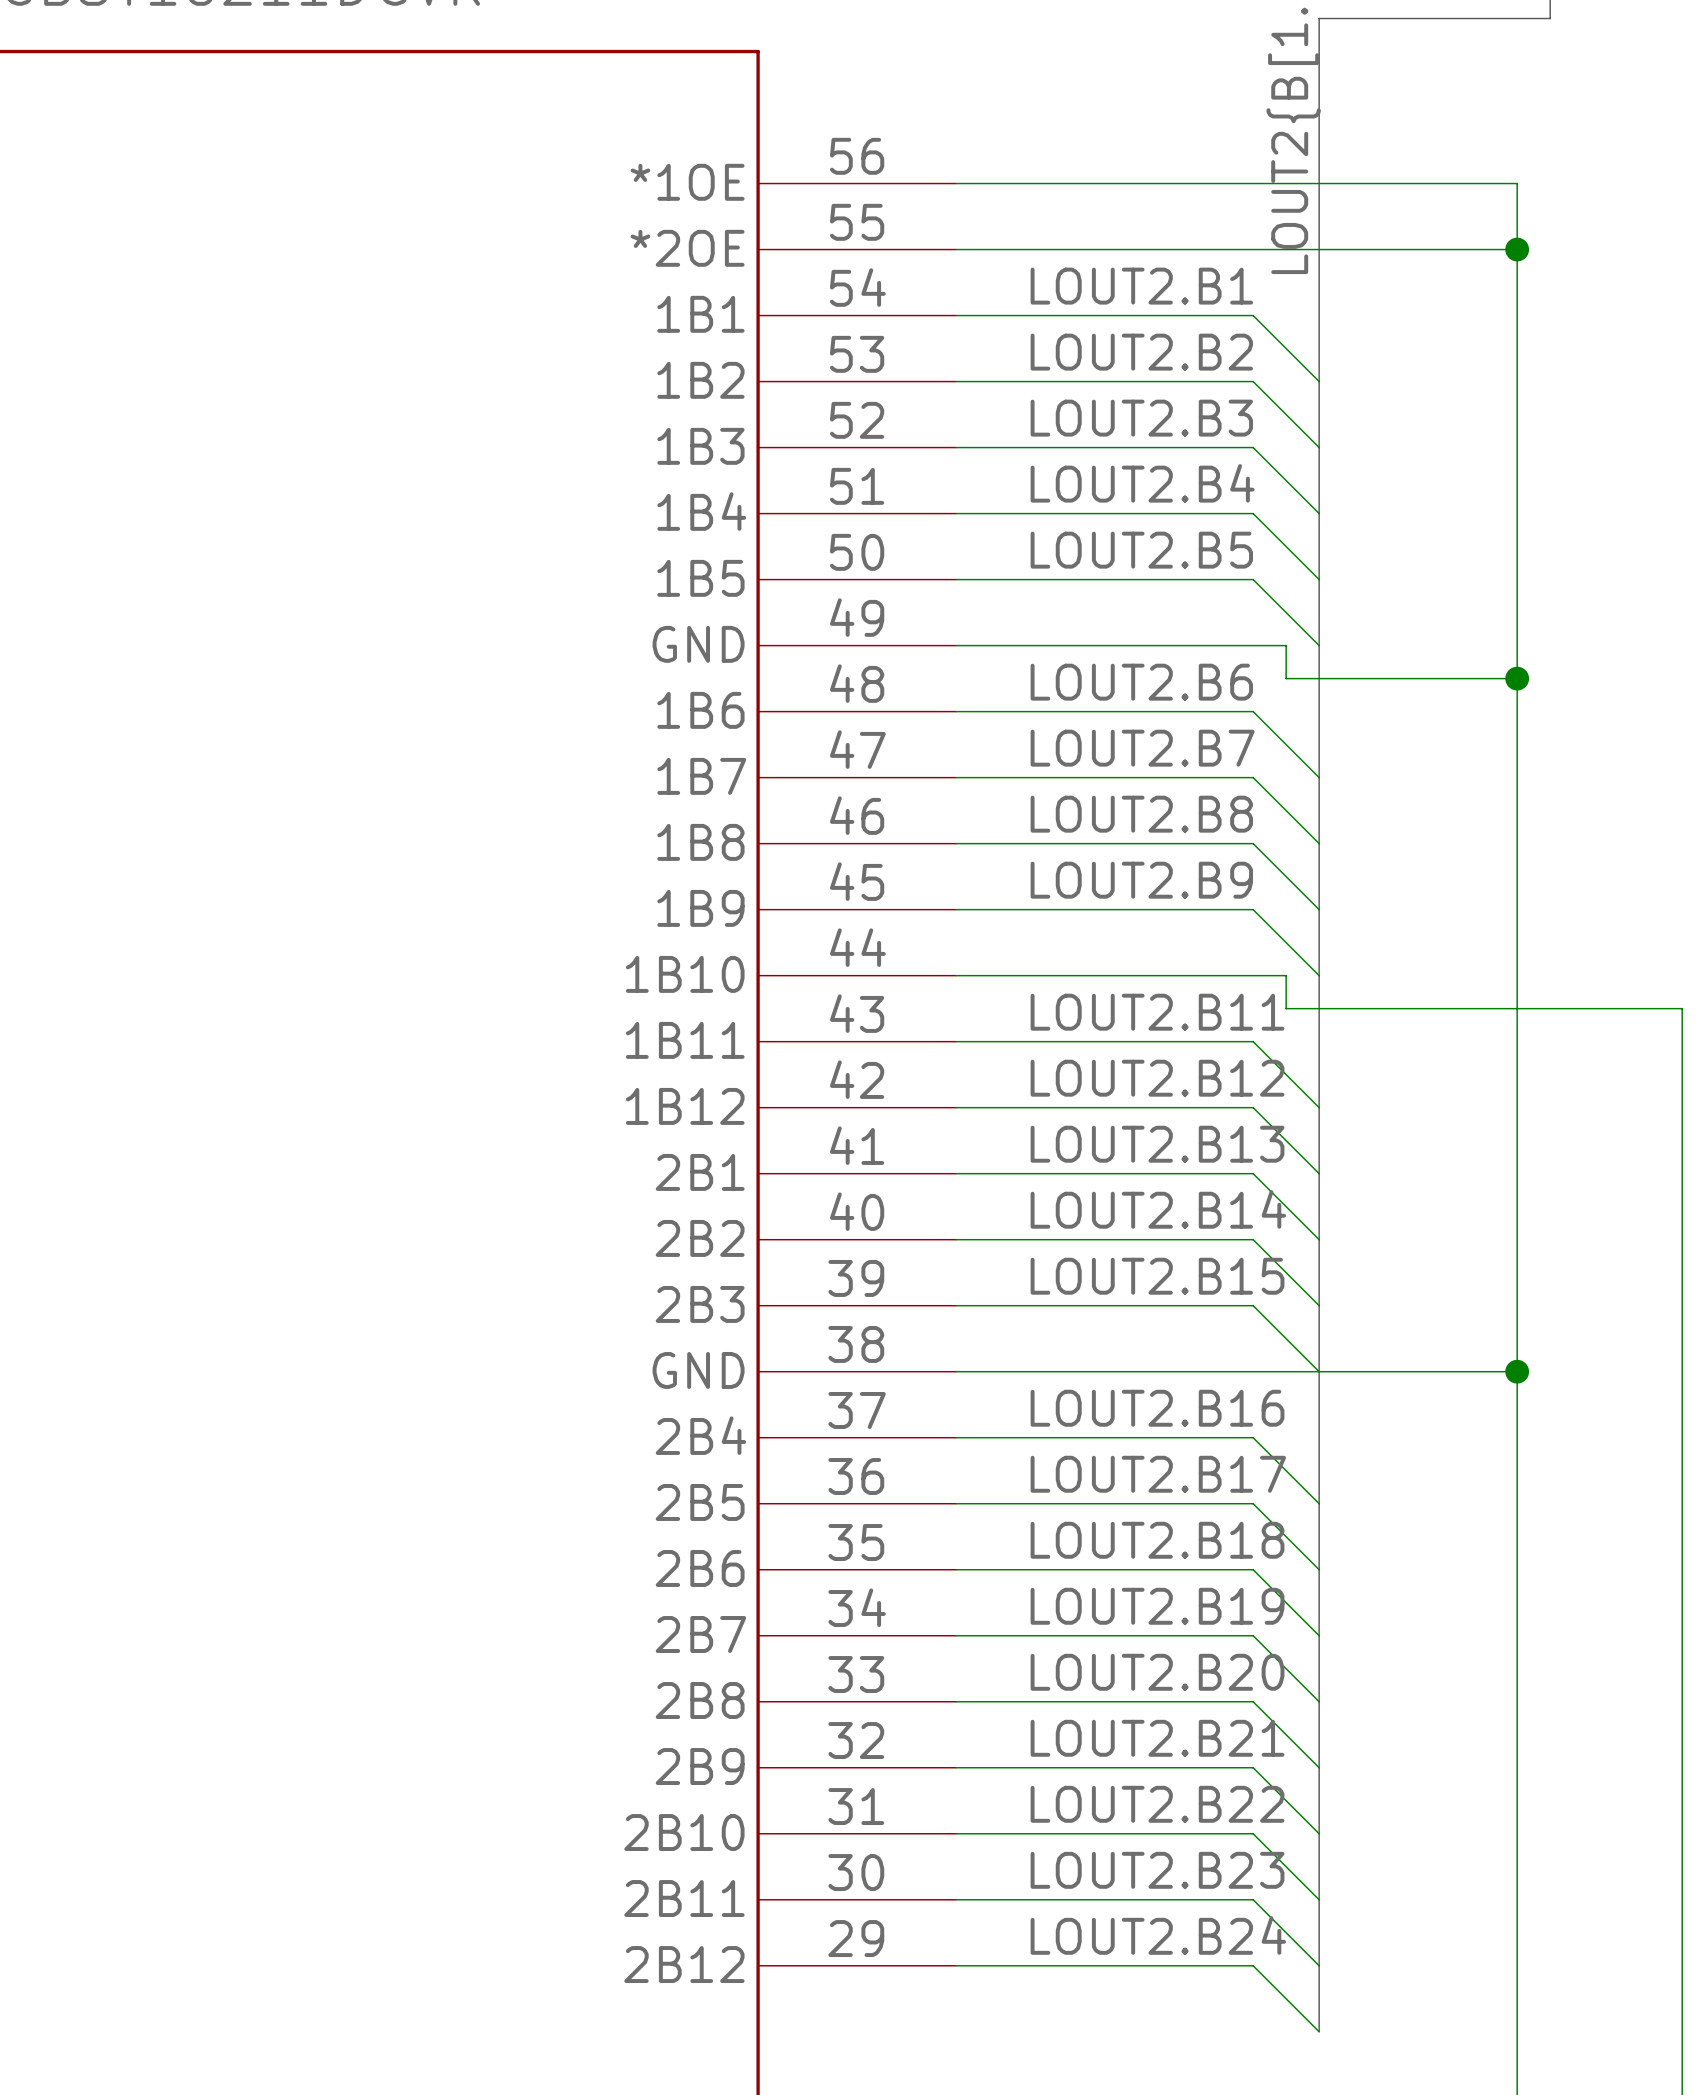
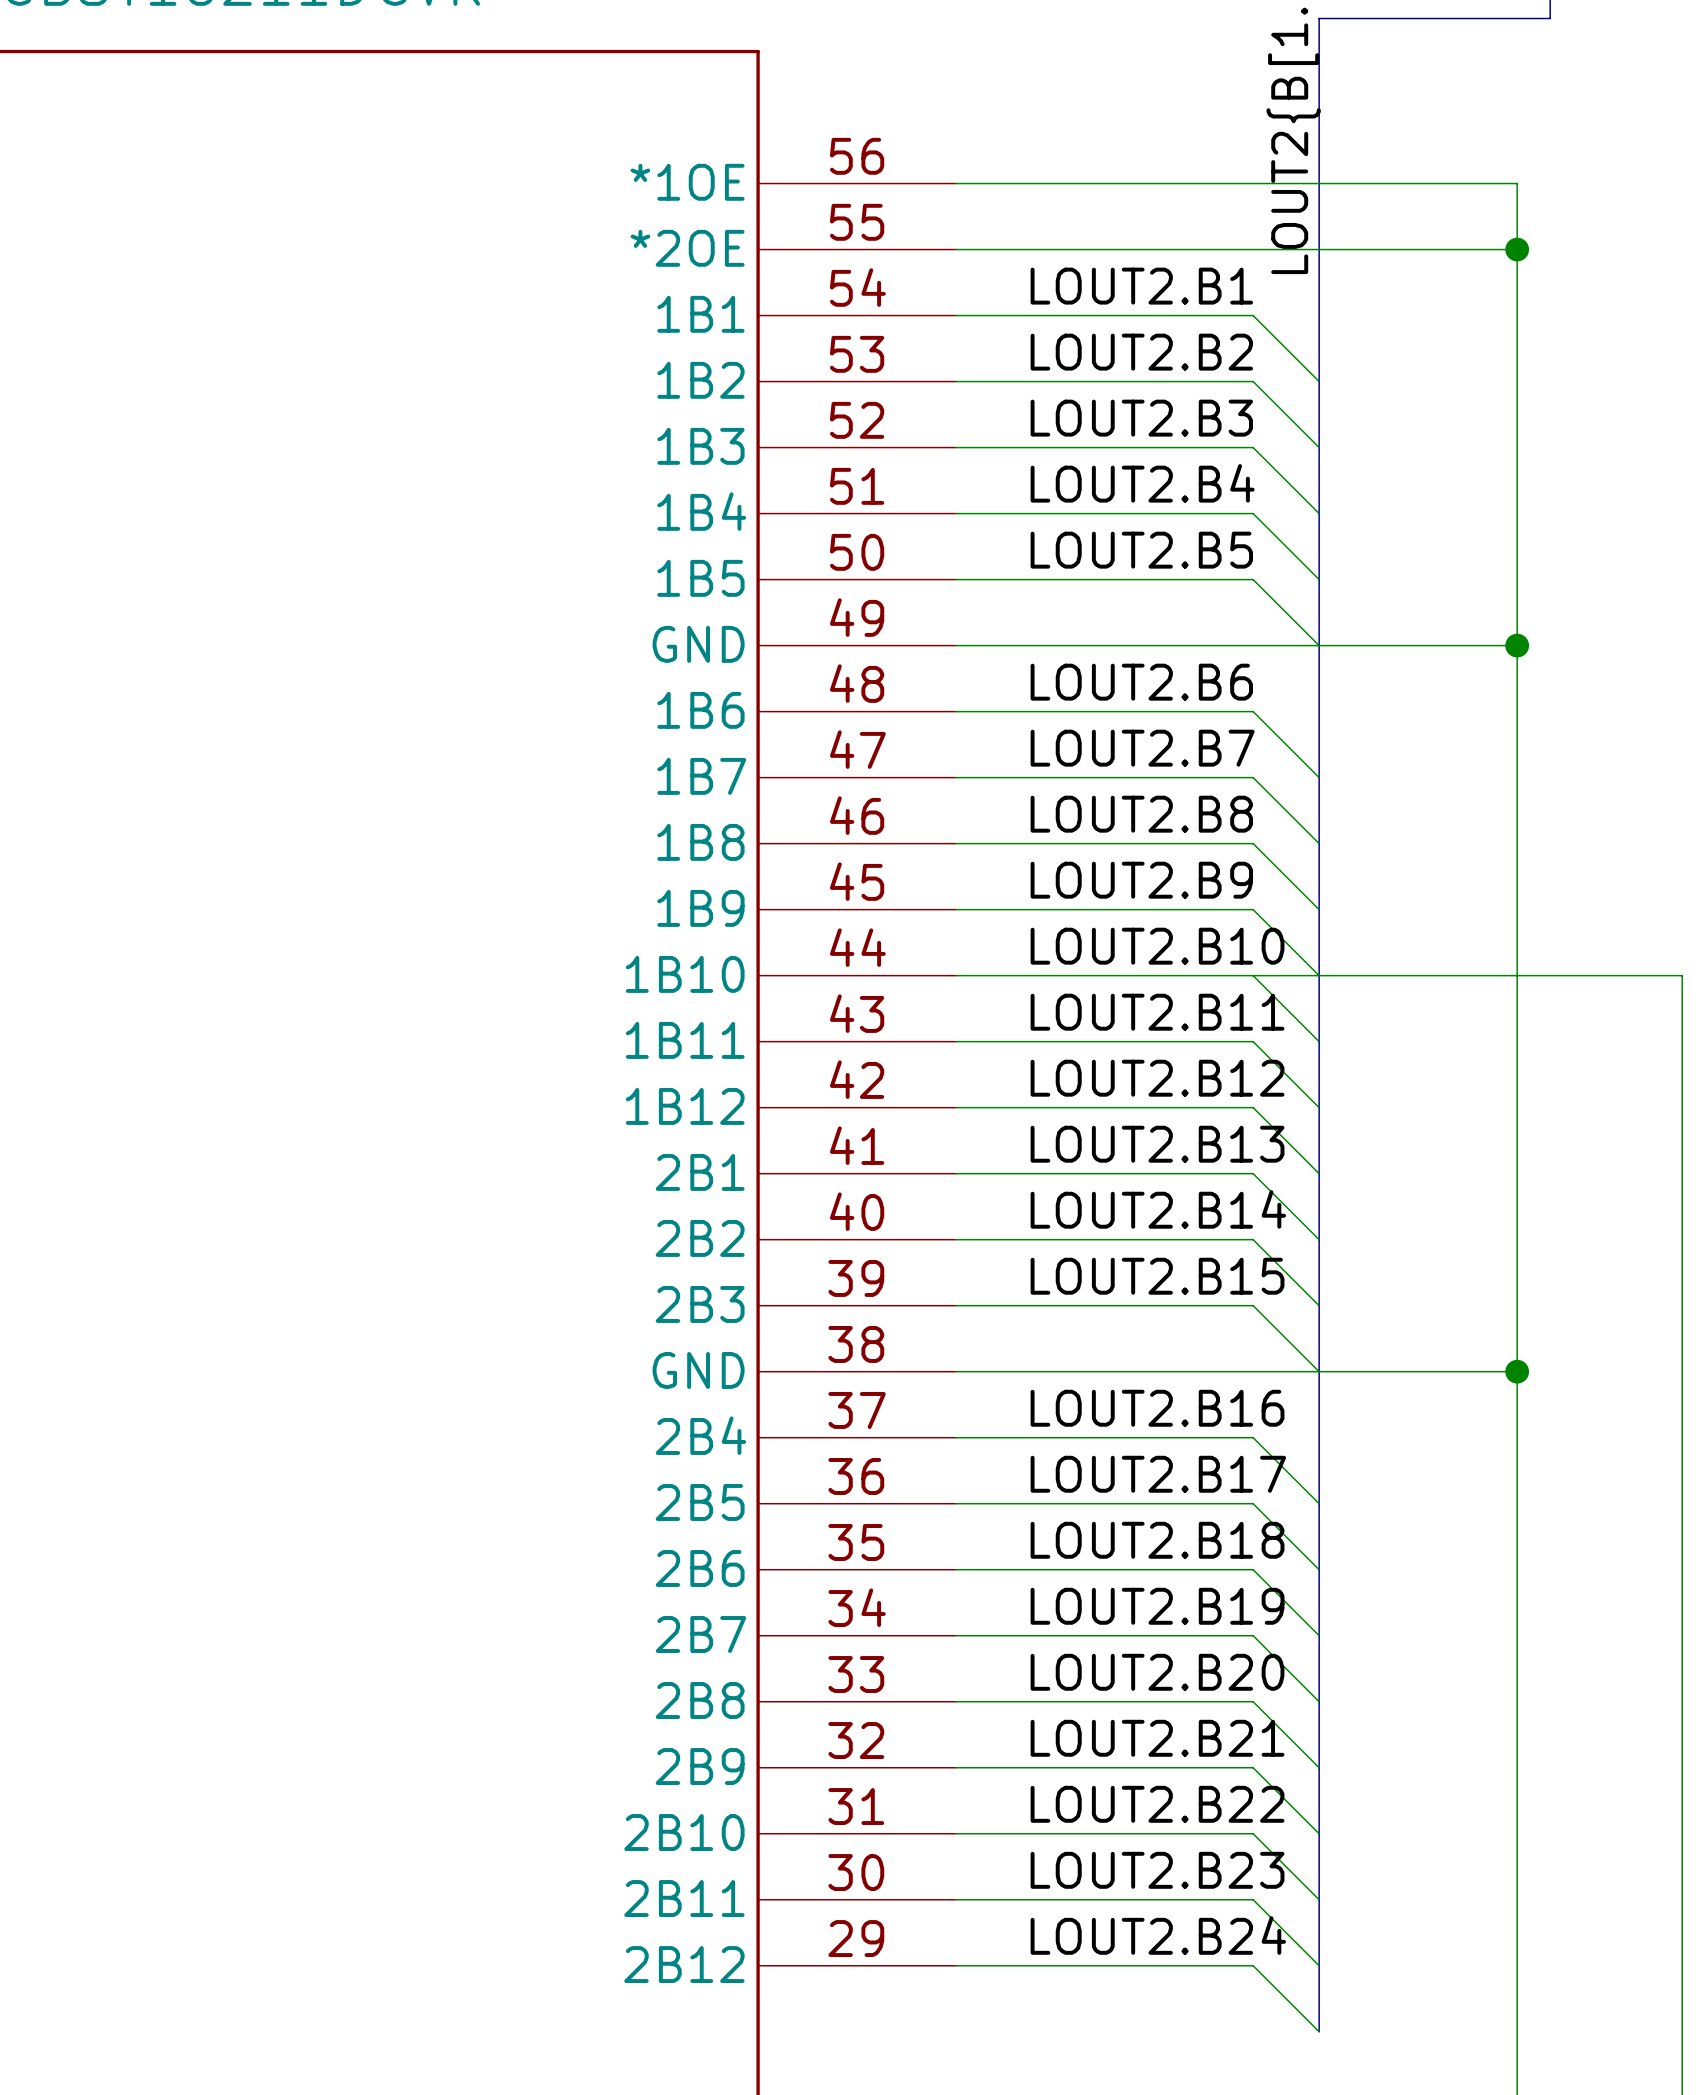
wire: (1286, 645) (1286, 678) (1517, 678) -> (1286, 645) (1517, 645)
junction position: (1517, 678) -> (1517, 645)
label: none -> LOUT2.B10 (1157, 946)
wire: none -> (1253, 975) (1319, 1041)
wire: (1286, 975) (1286, 1008) (1682, 1008) -> (1286, 975) (1682, 975) (1682, 1008)

